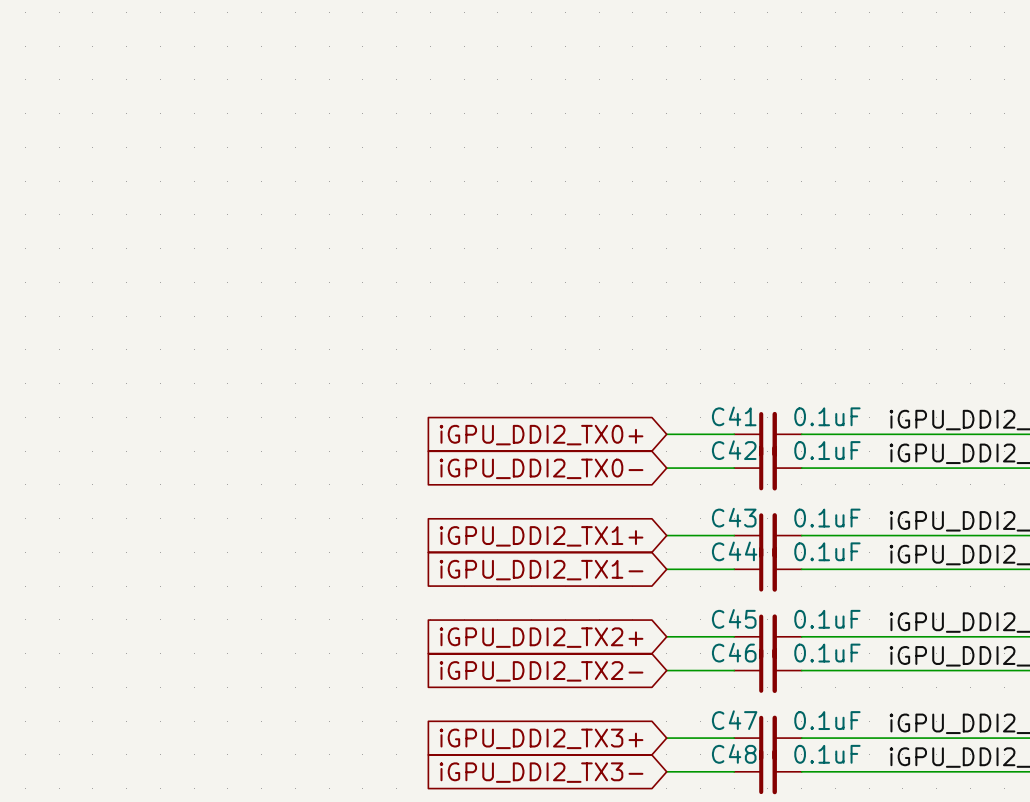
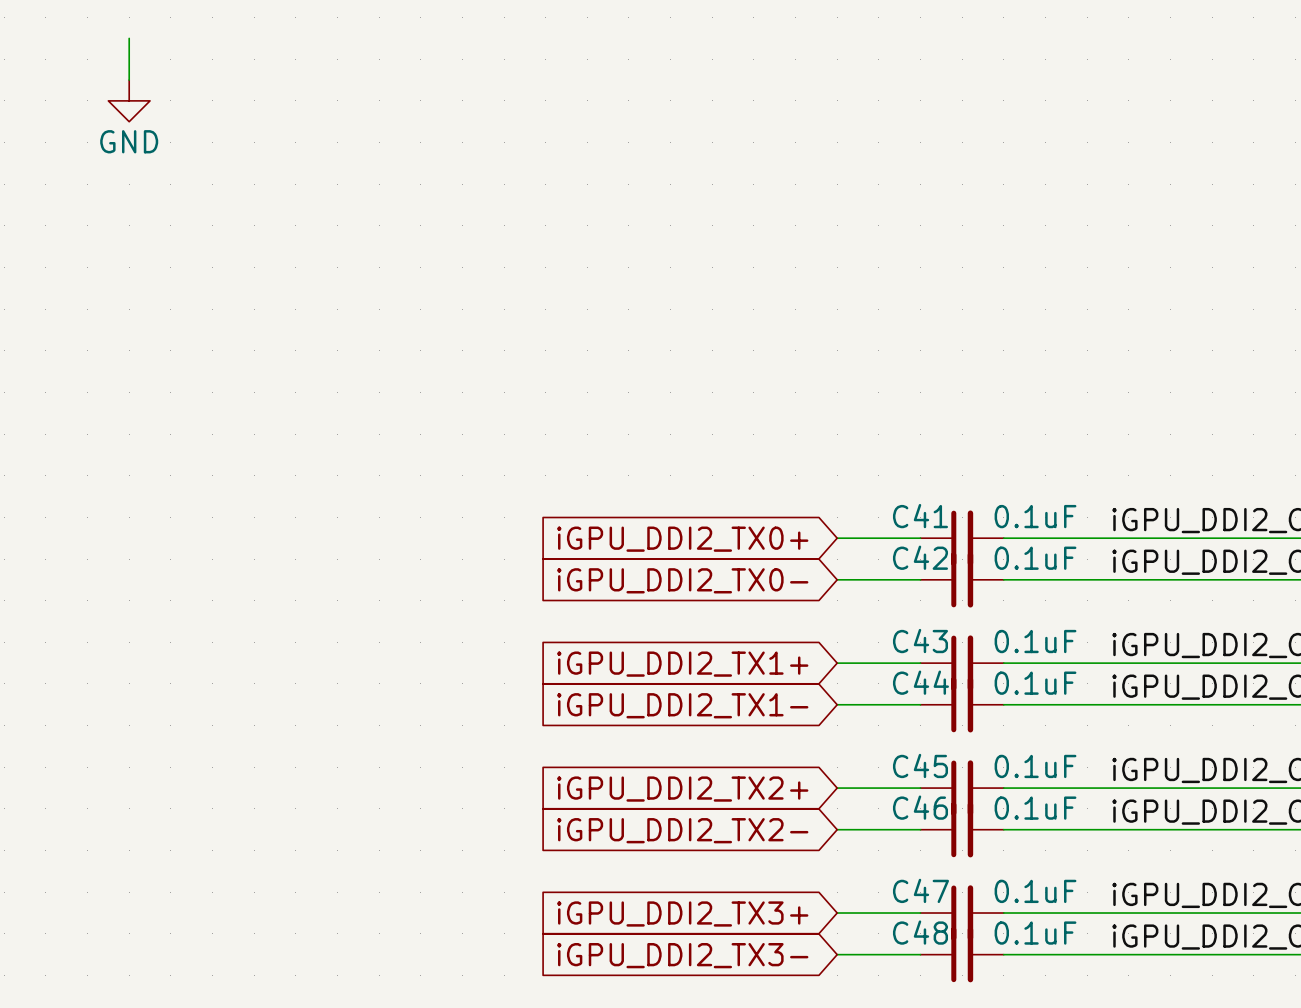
wire: none -> (129, 38) (129, 80)
power symbol: none -> GND (129, 100)

